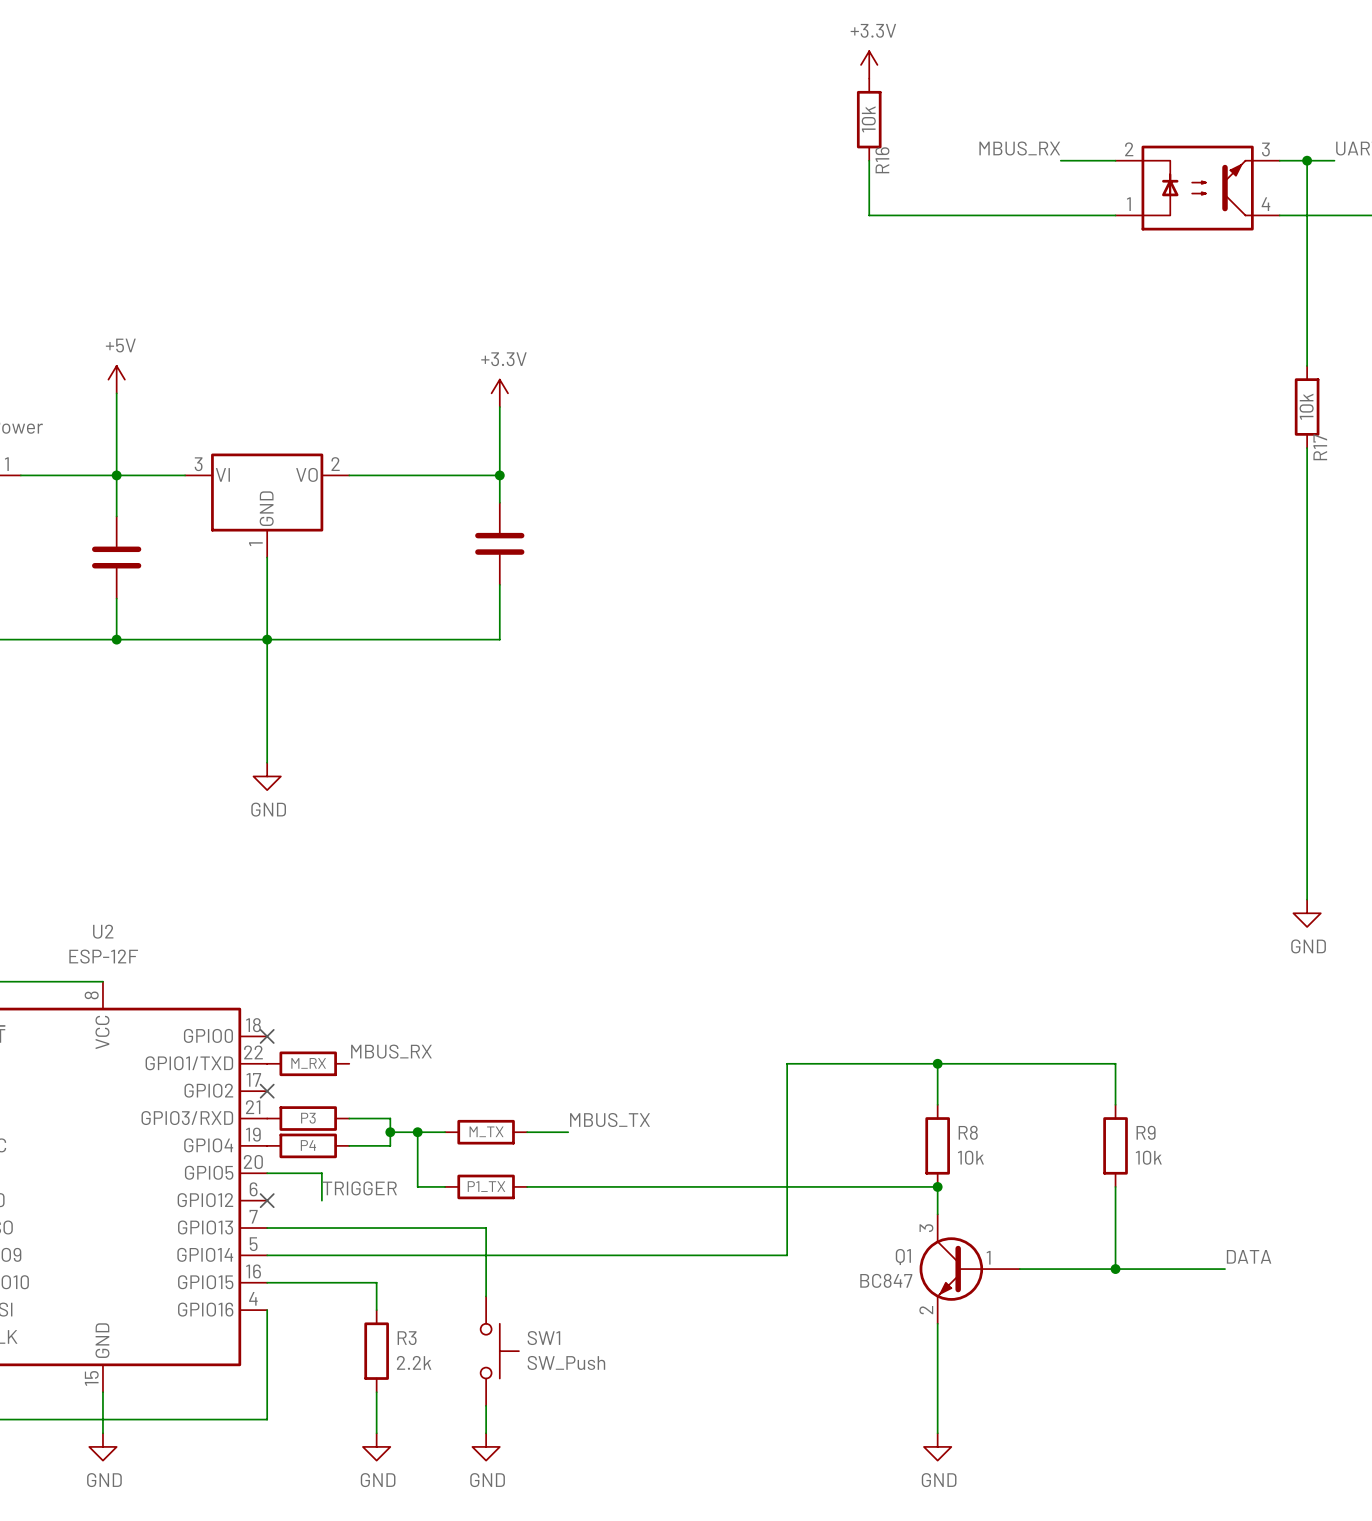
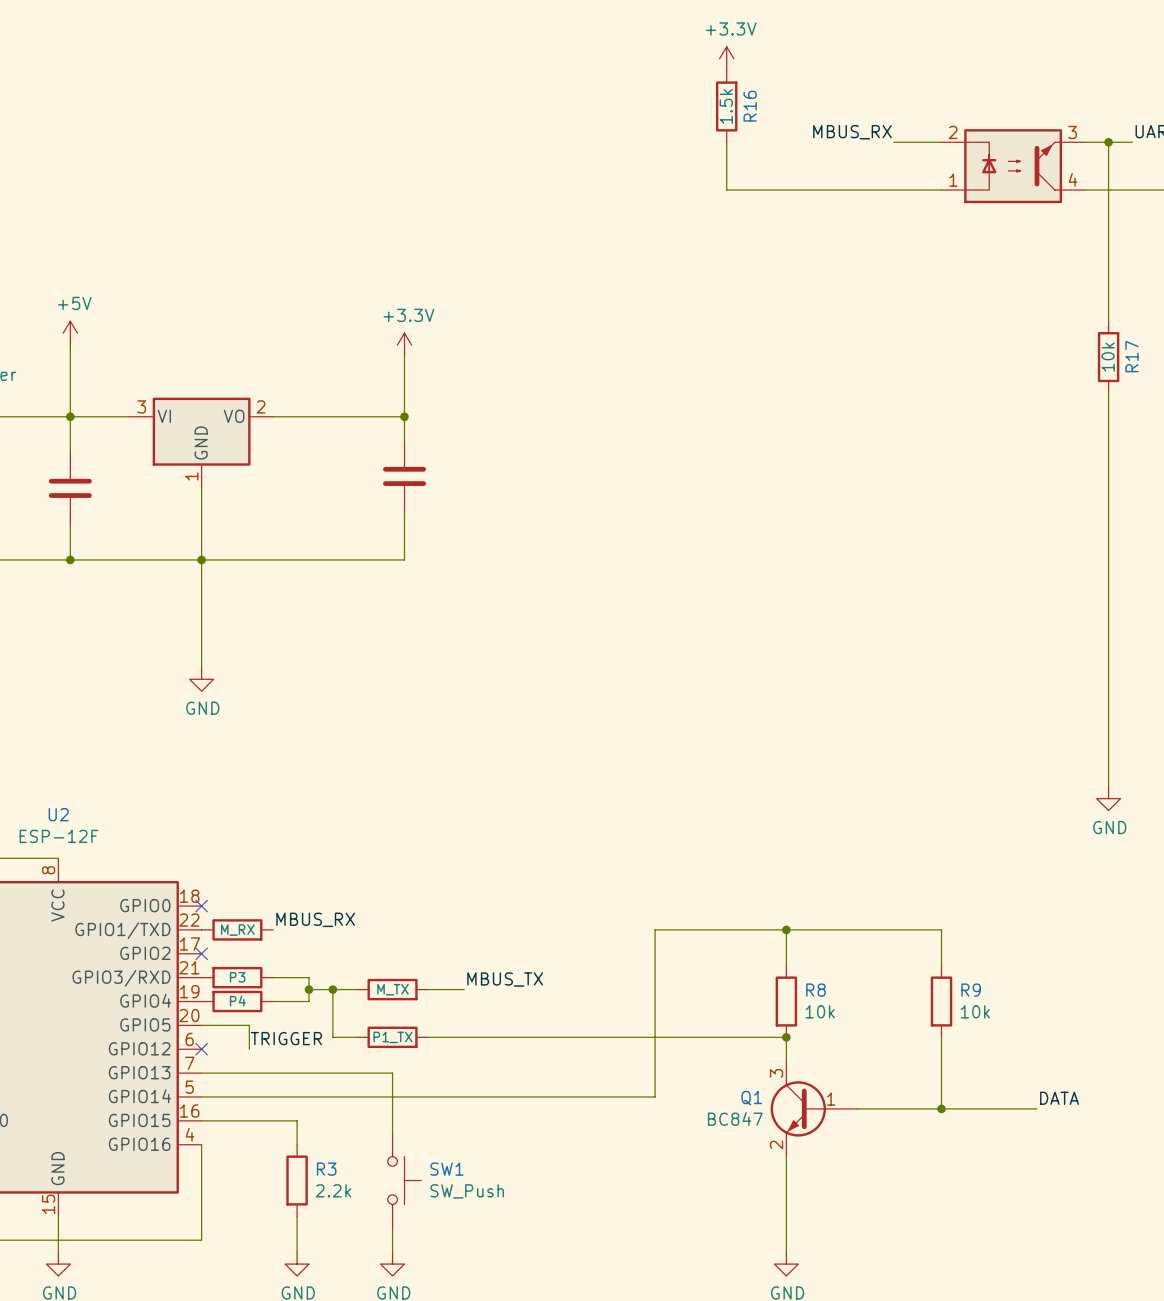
R16 value: 10k (868, 119) -> 1.5k (726, 106)
R16 name position: R16 (882, 160) -> R16 (750, 106)
R17 name position: R17 (1320, 447) -> R17 (1132, 356)

